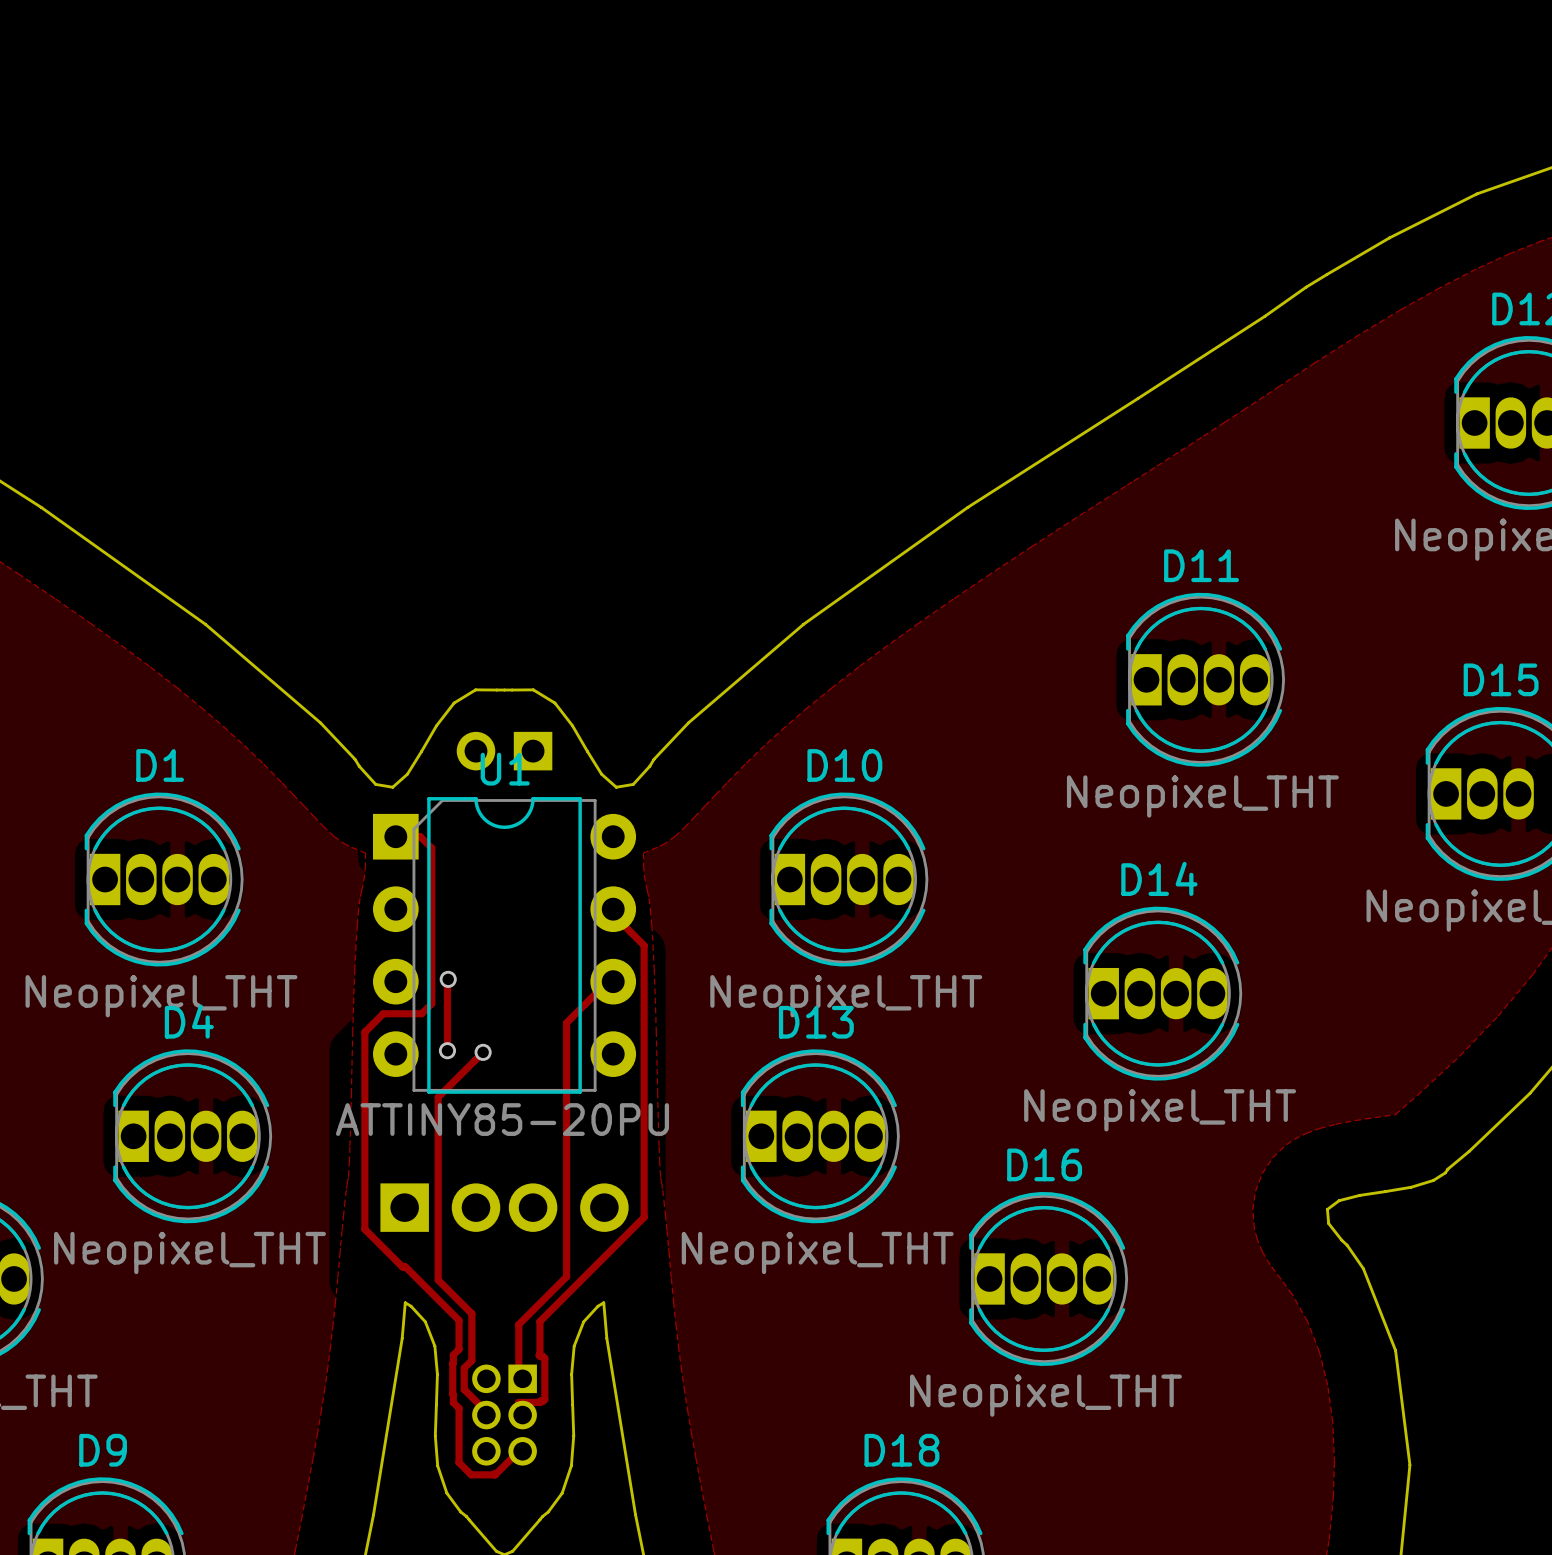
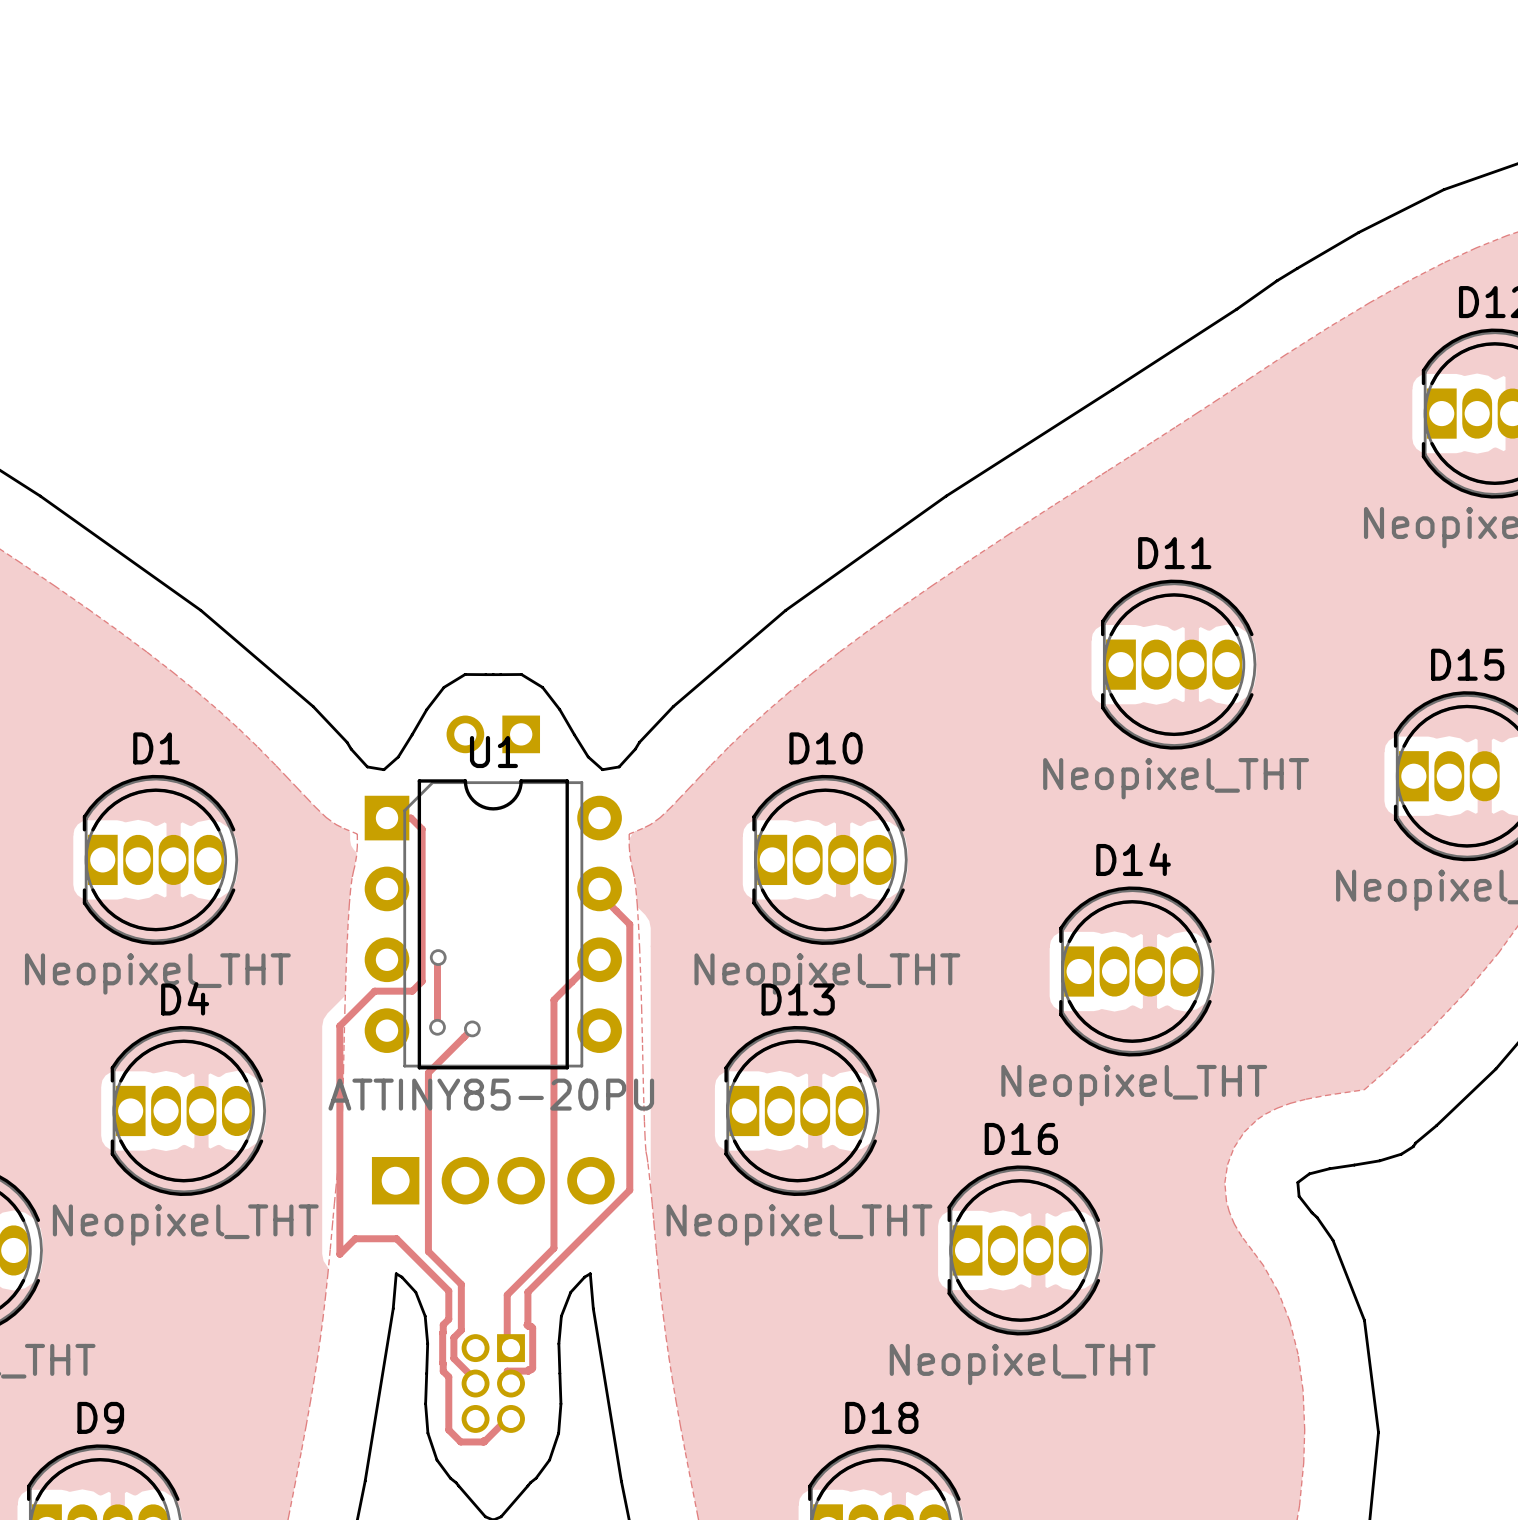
track: (364, 1032) (364, 1229) (402, 1266) -> (356, 1009) (339, 1026) (339, 1254) (355, 1238) (393, 1238)

